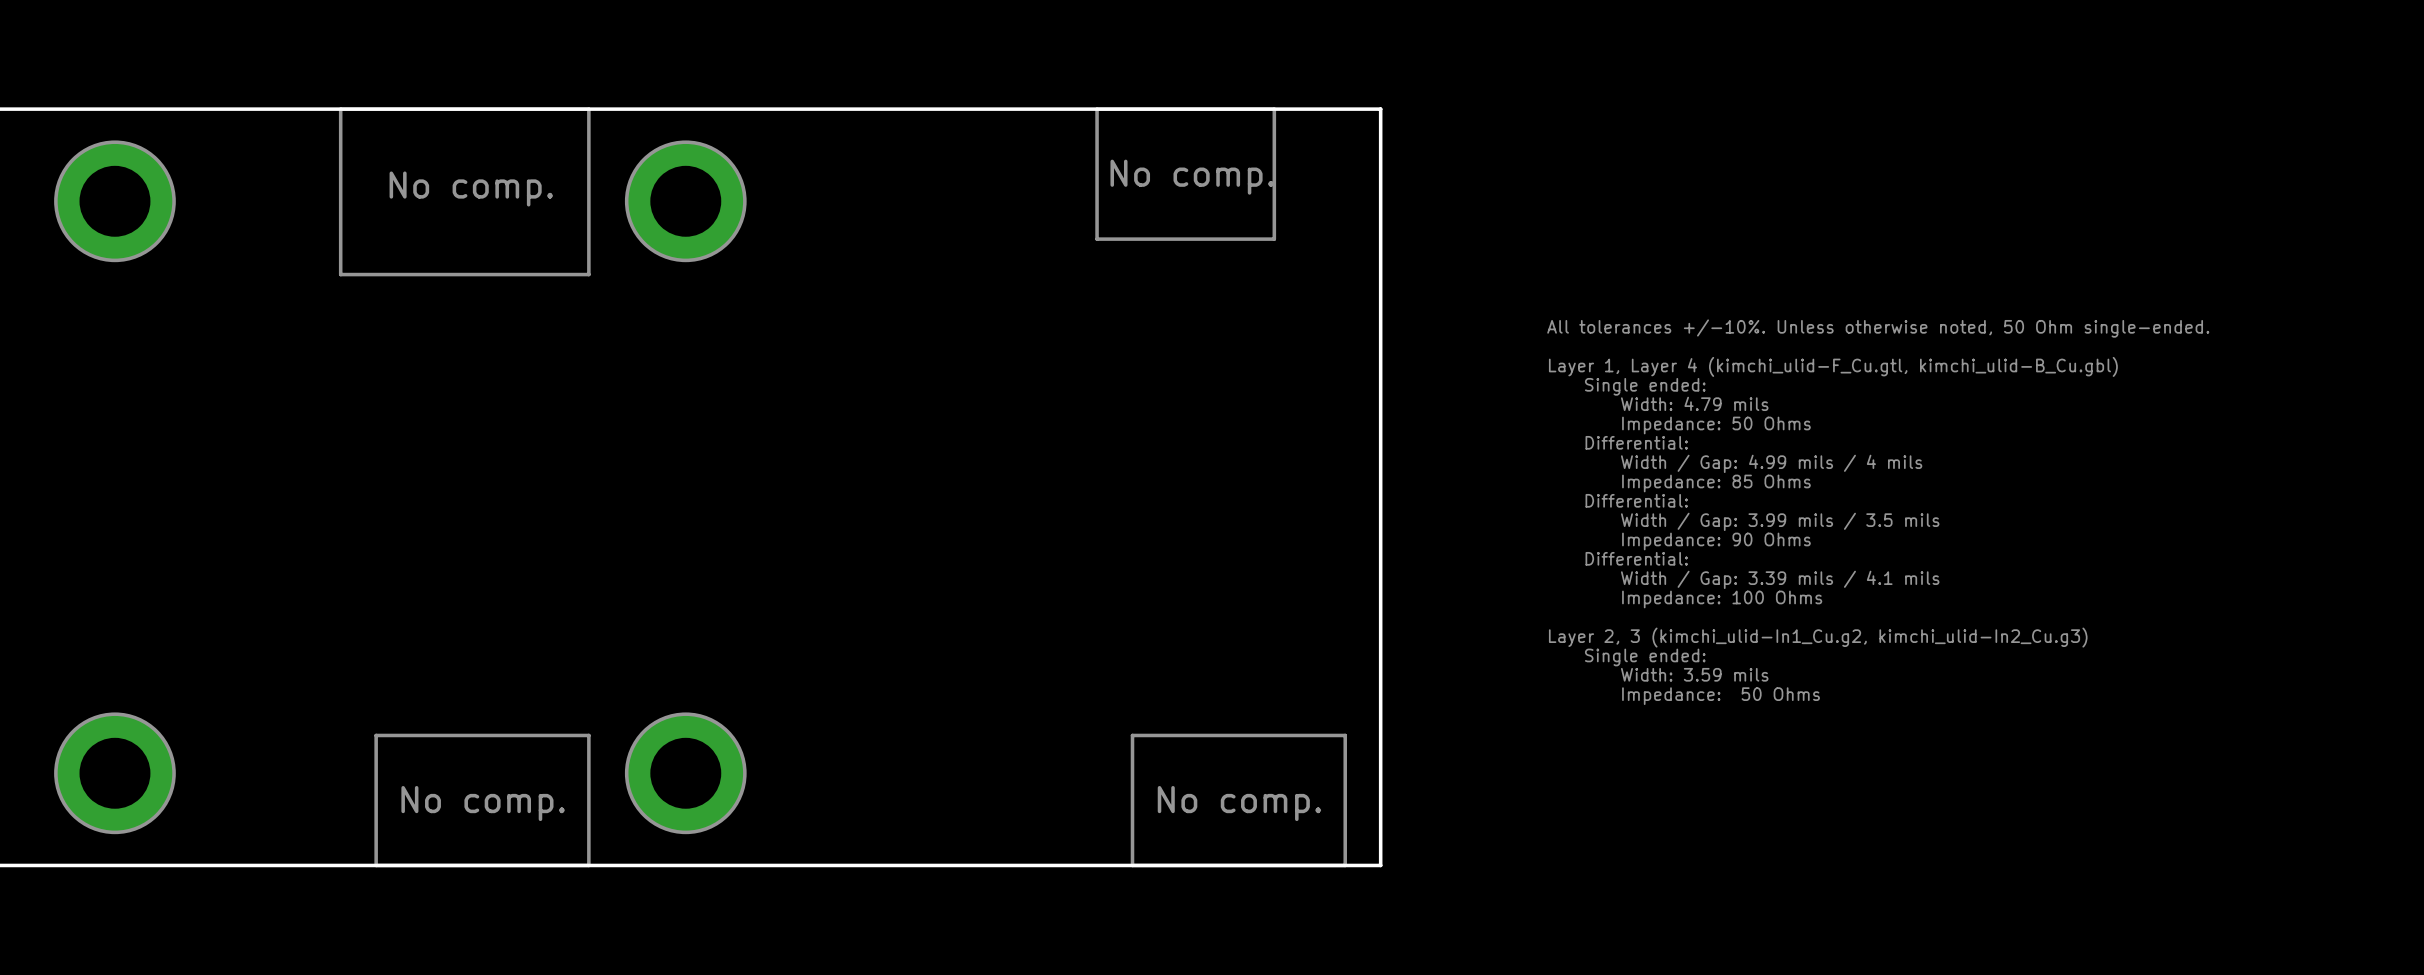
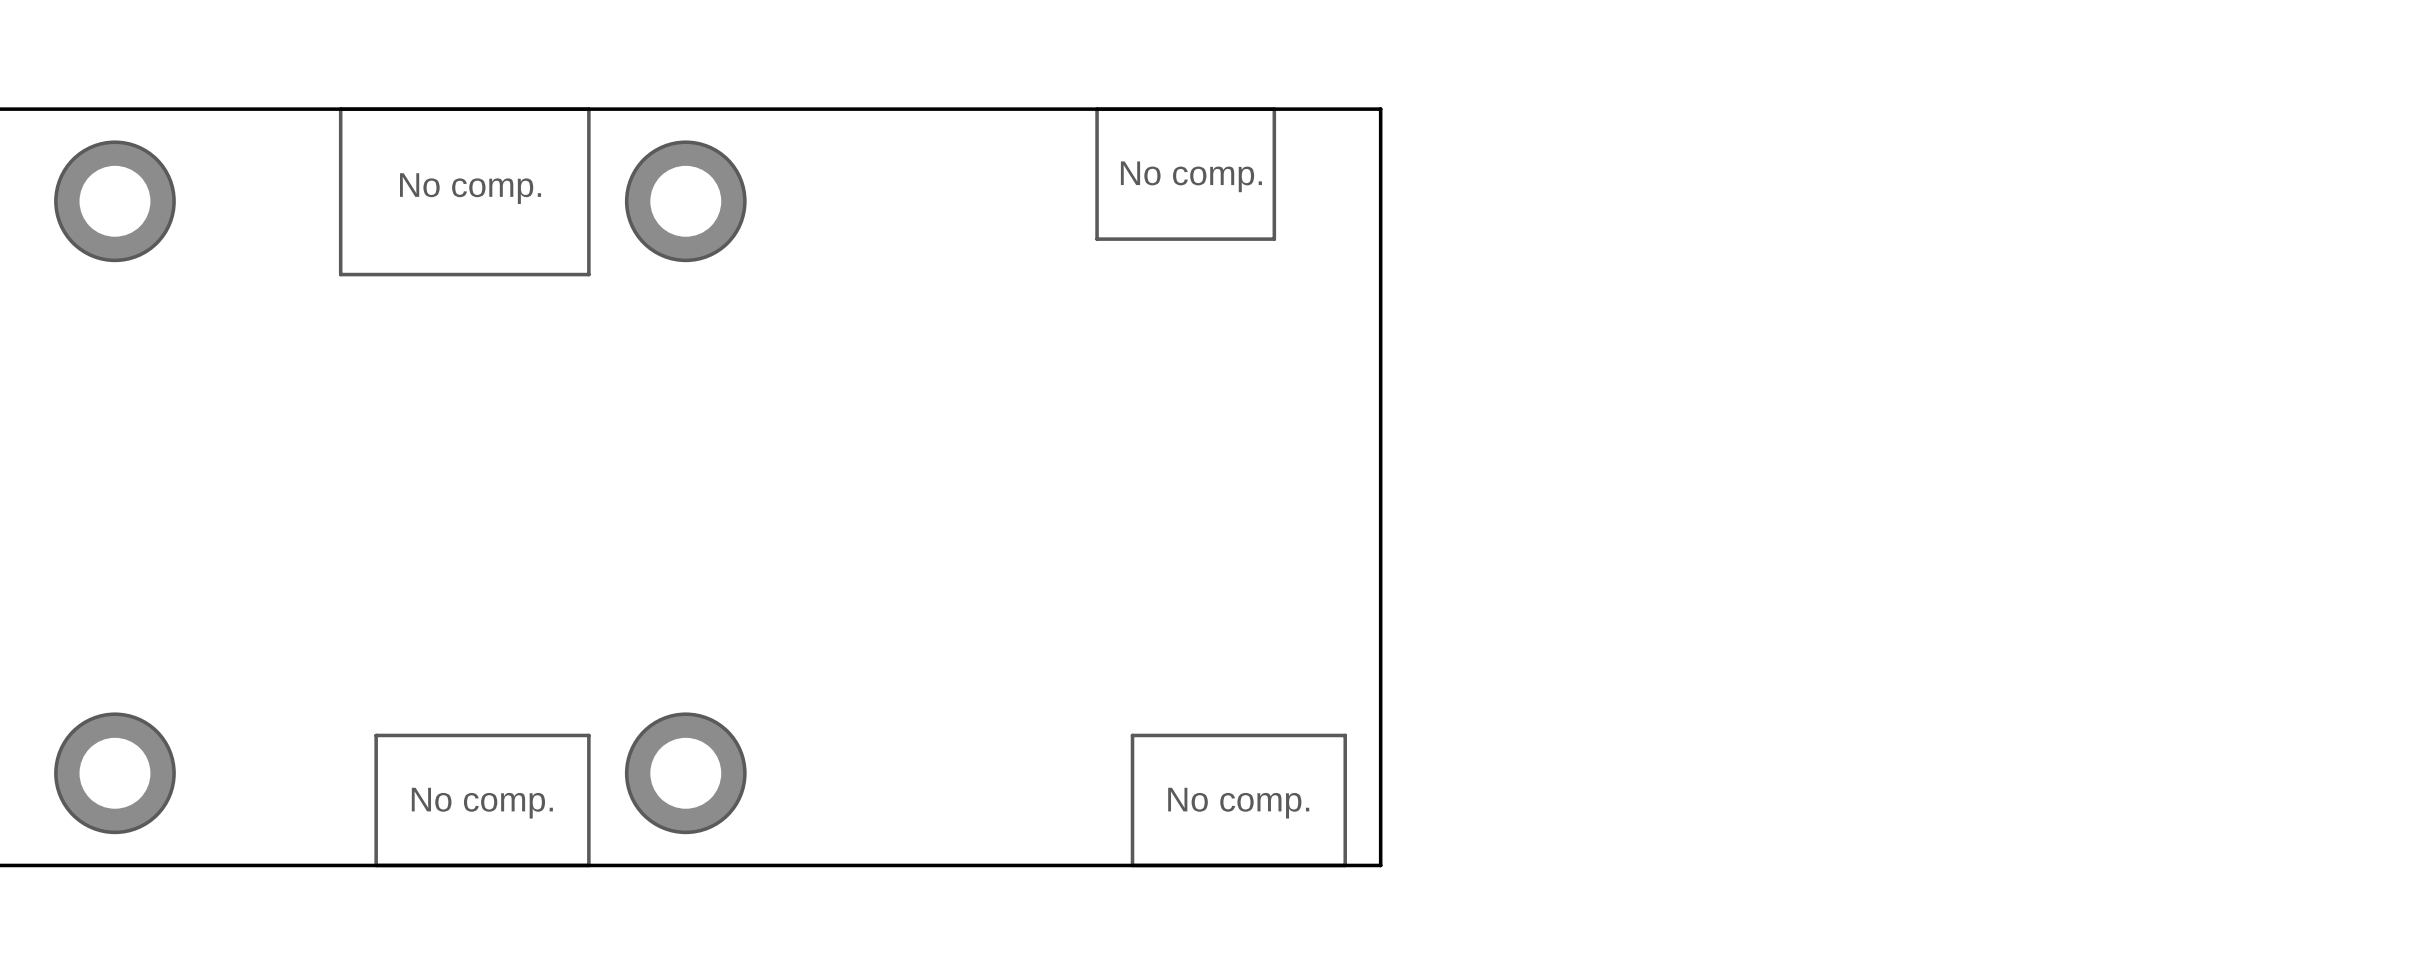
text: All tolerances +/-10%. Unless otherwise noted, 50 Ohm single-ended. (1878, 328) -> none
text: Layer 1, Layer 4 (kimchi_ulid-F_Cu.gtl, kimchi_ulid-B_Cu.gbl) (1833, 366) -> none
text: Single ended: (1645, 386) -> none
text: Width: 4.79 mils (1694, 403) -> none
text: Impedance: 50 Ohms (1716, 425) -> none
text: Differential: (1636, 442) -> none
text: Width / Gap: 4.99 mils / 4 mils (1771, 463) -> none
text: Impedance: 85 Ohms (1716, 483) -> none
text: Differential: (1636, 500) -> none
text: Width / Gap: 3.99 mils / 3.5 mils (1780, 521) -> none
text: Impedance: 90 Ohms (1716, 541) -> none
text: Differential: (1636, 558) -> none
text: Width / Gap: 3.39 mils / 4.1 mils (1780, 579) -> none
text: Impedance: 100 Ohms (1722, 599) -> none
text: Layer 2, 3 (kimchi_ulid-In1_Cu.g2, kimchi_ulid-In2_Cu.g3) (1818, 637) -> none
text: Single ended: (1645, 657) -> none
text: Width: 3.59 mils (1694, 674) -> none
text: Impedance: 50 Ohms (1721, 696) -> none

